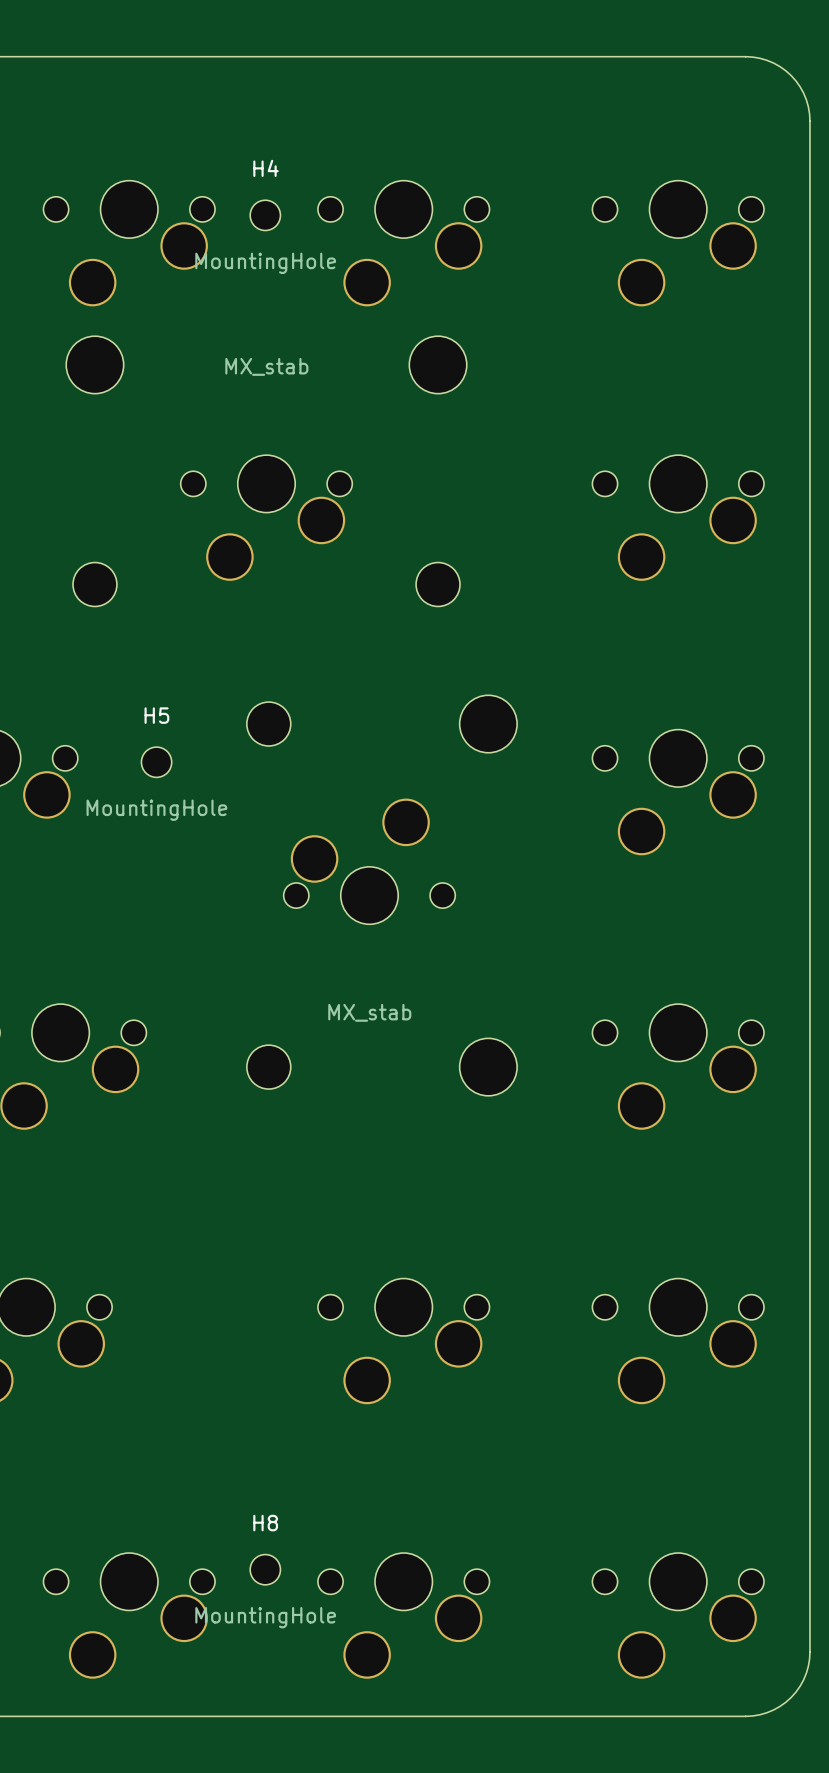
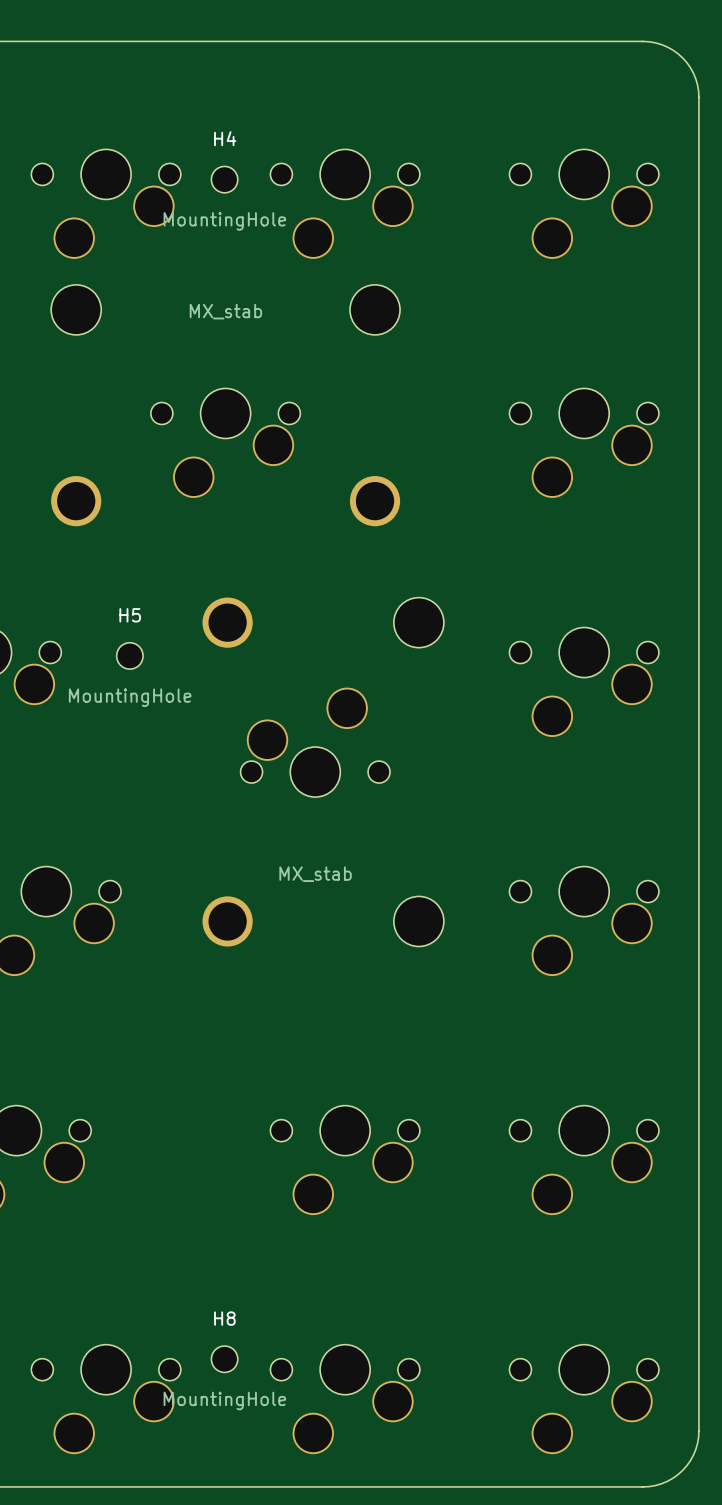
part footprint: [66, 336, 467, 607] -> [51, 284, 401, 527]
part footprint: [246, 695, 518, 1096] -> [202, 597, 444, 947]

